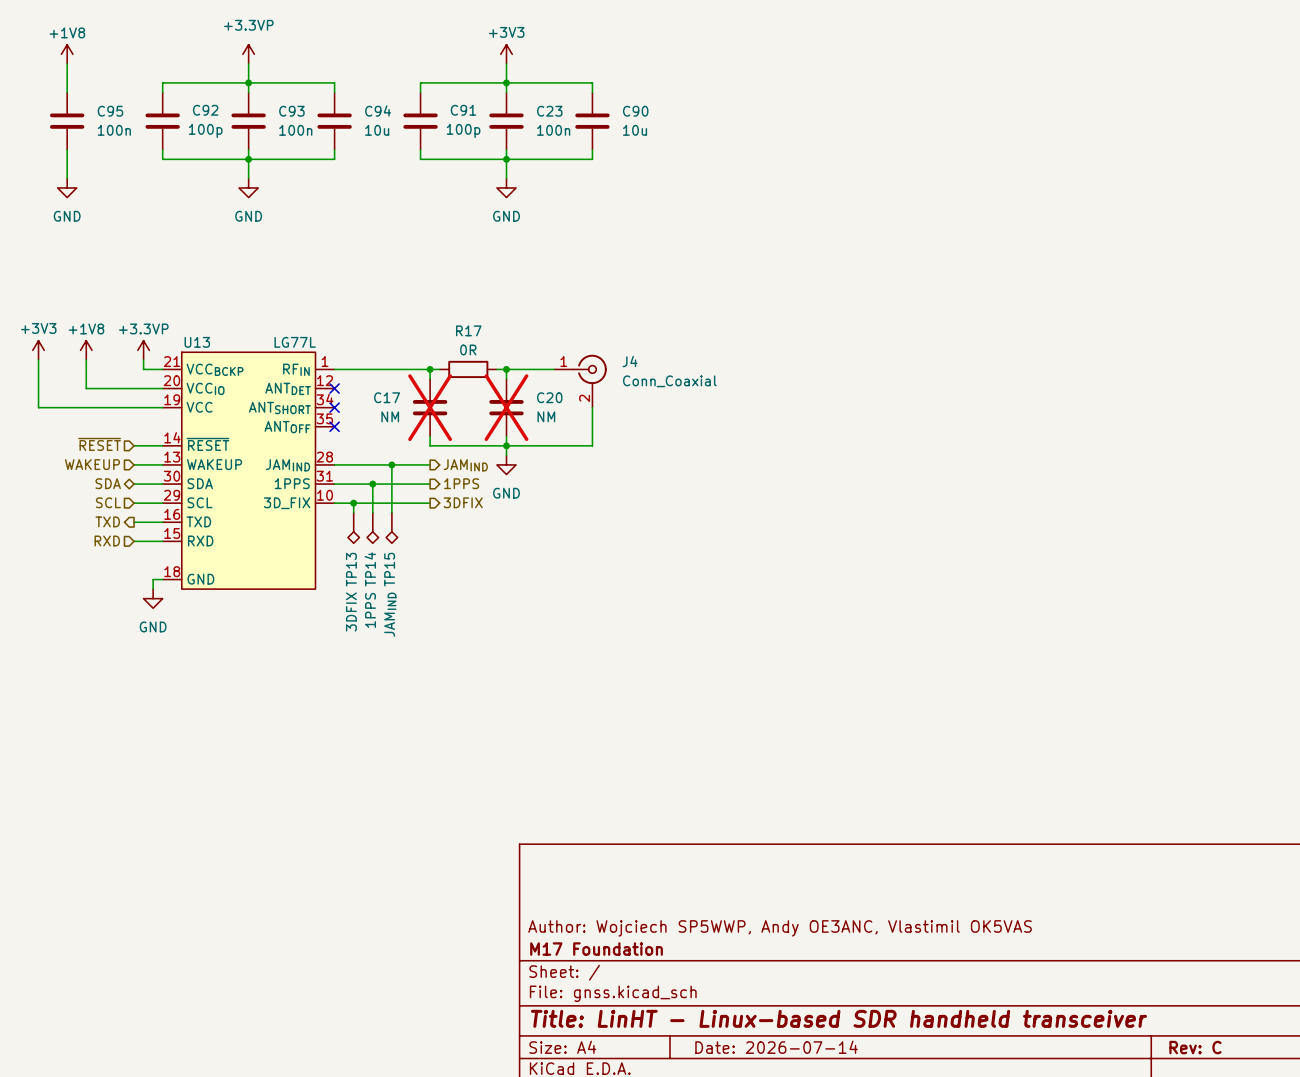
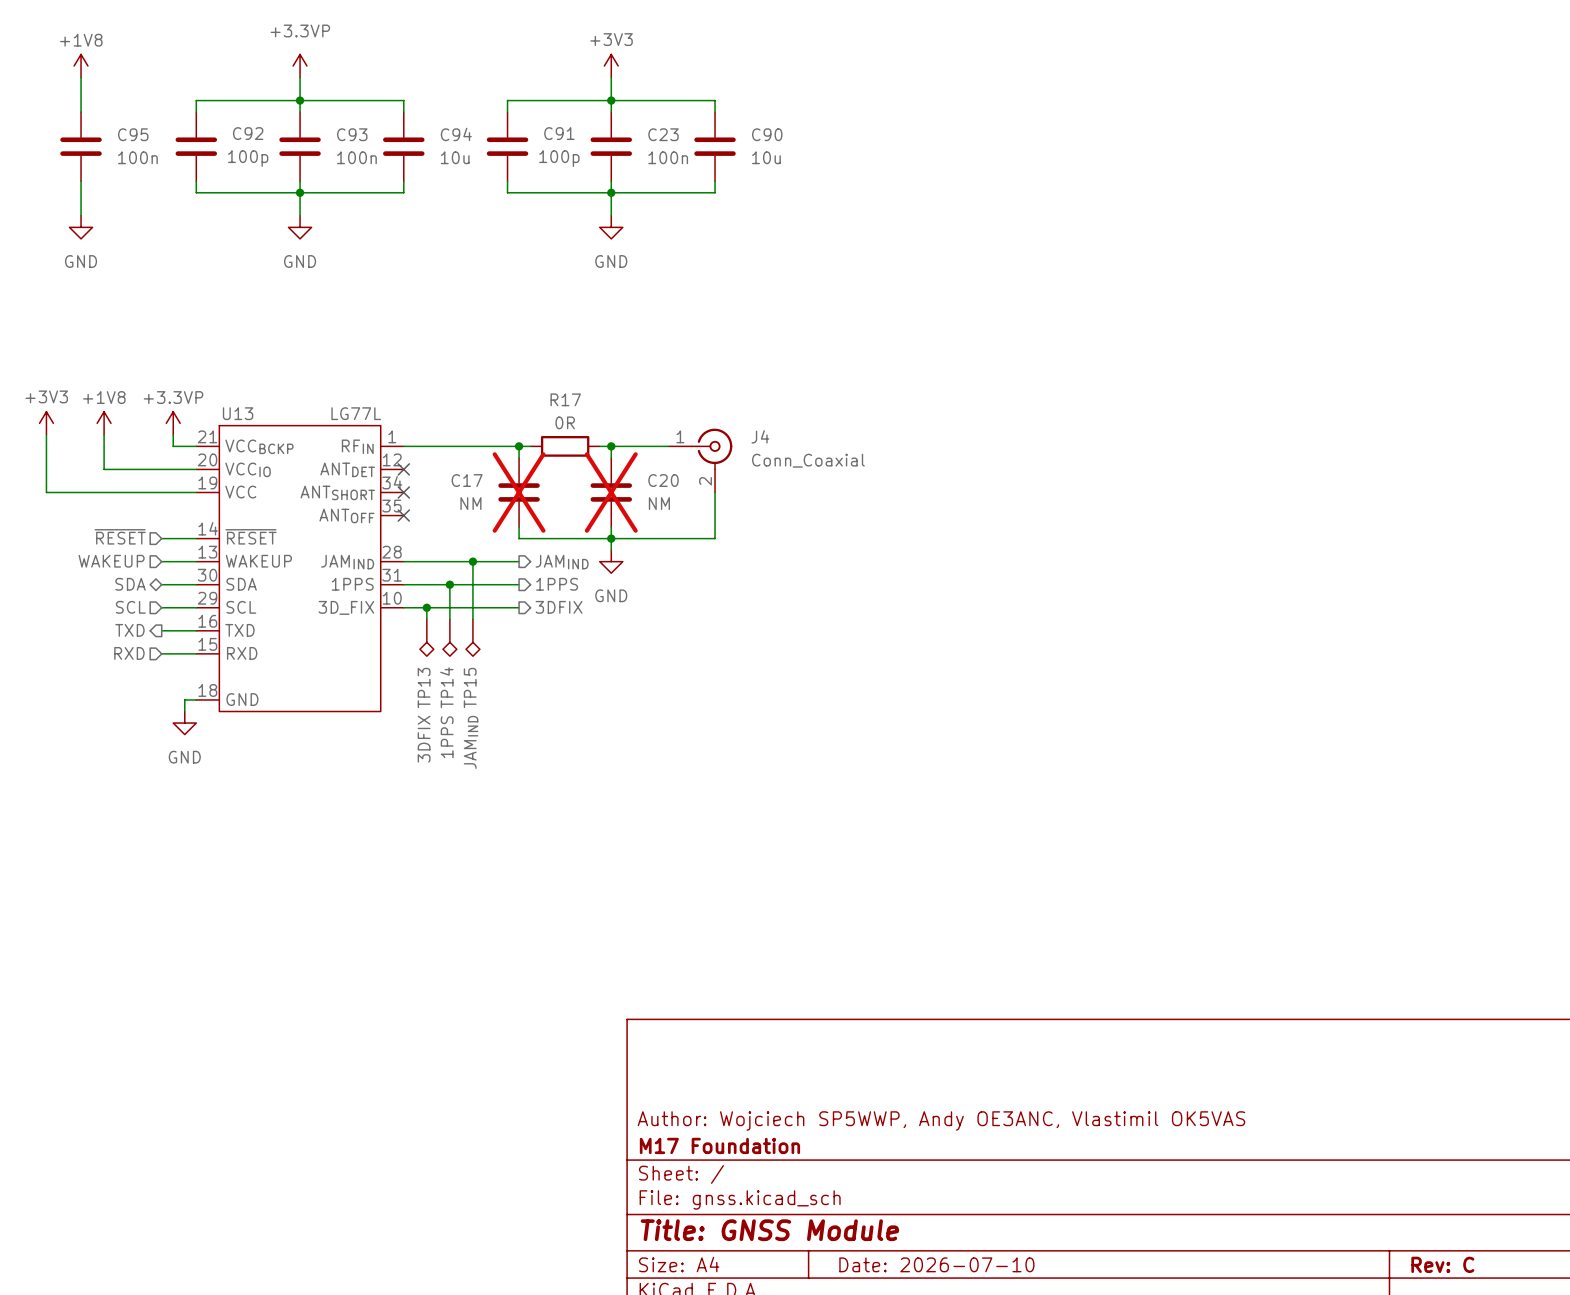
title block: Title: LinHT - Linux-based SDR handheld transceiver (838, 1018) -> Title: GNSS Module (769, 1230)
title block: Date: 2026-07-14 (776, 1047) -> Date: 2026-07-10 (936, 1264)

